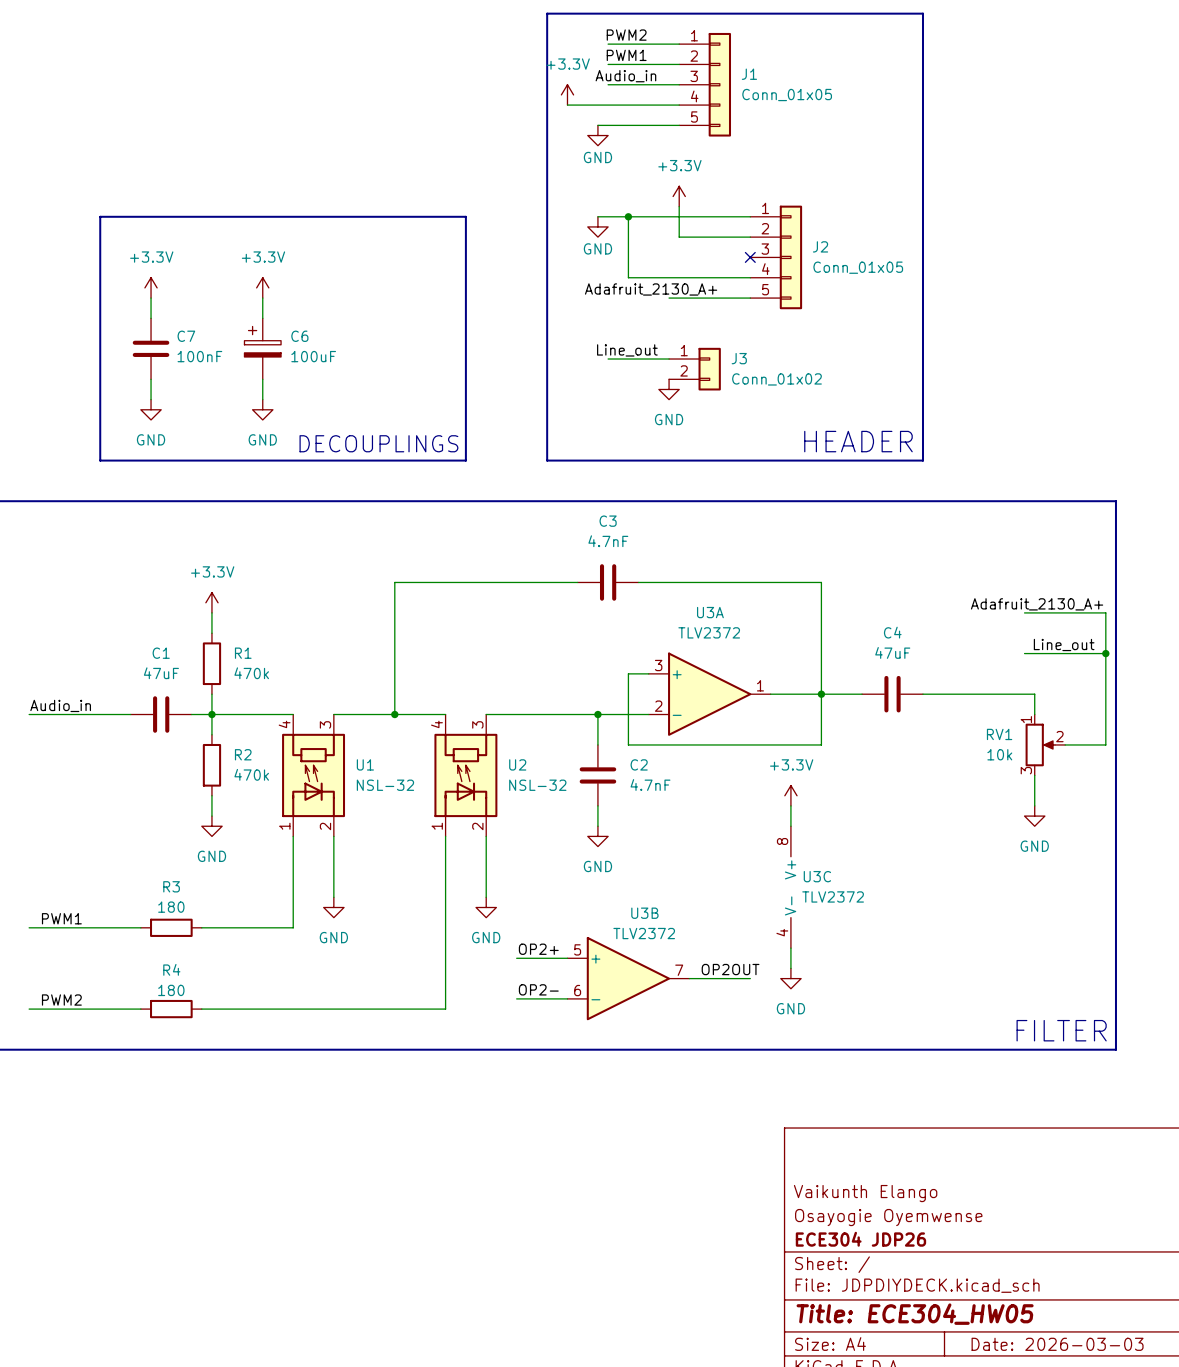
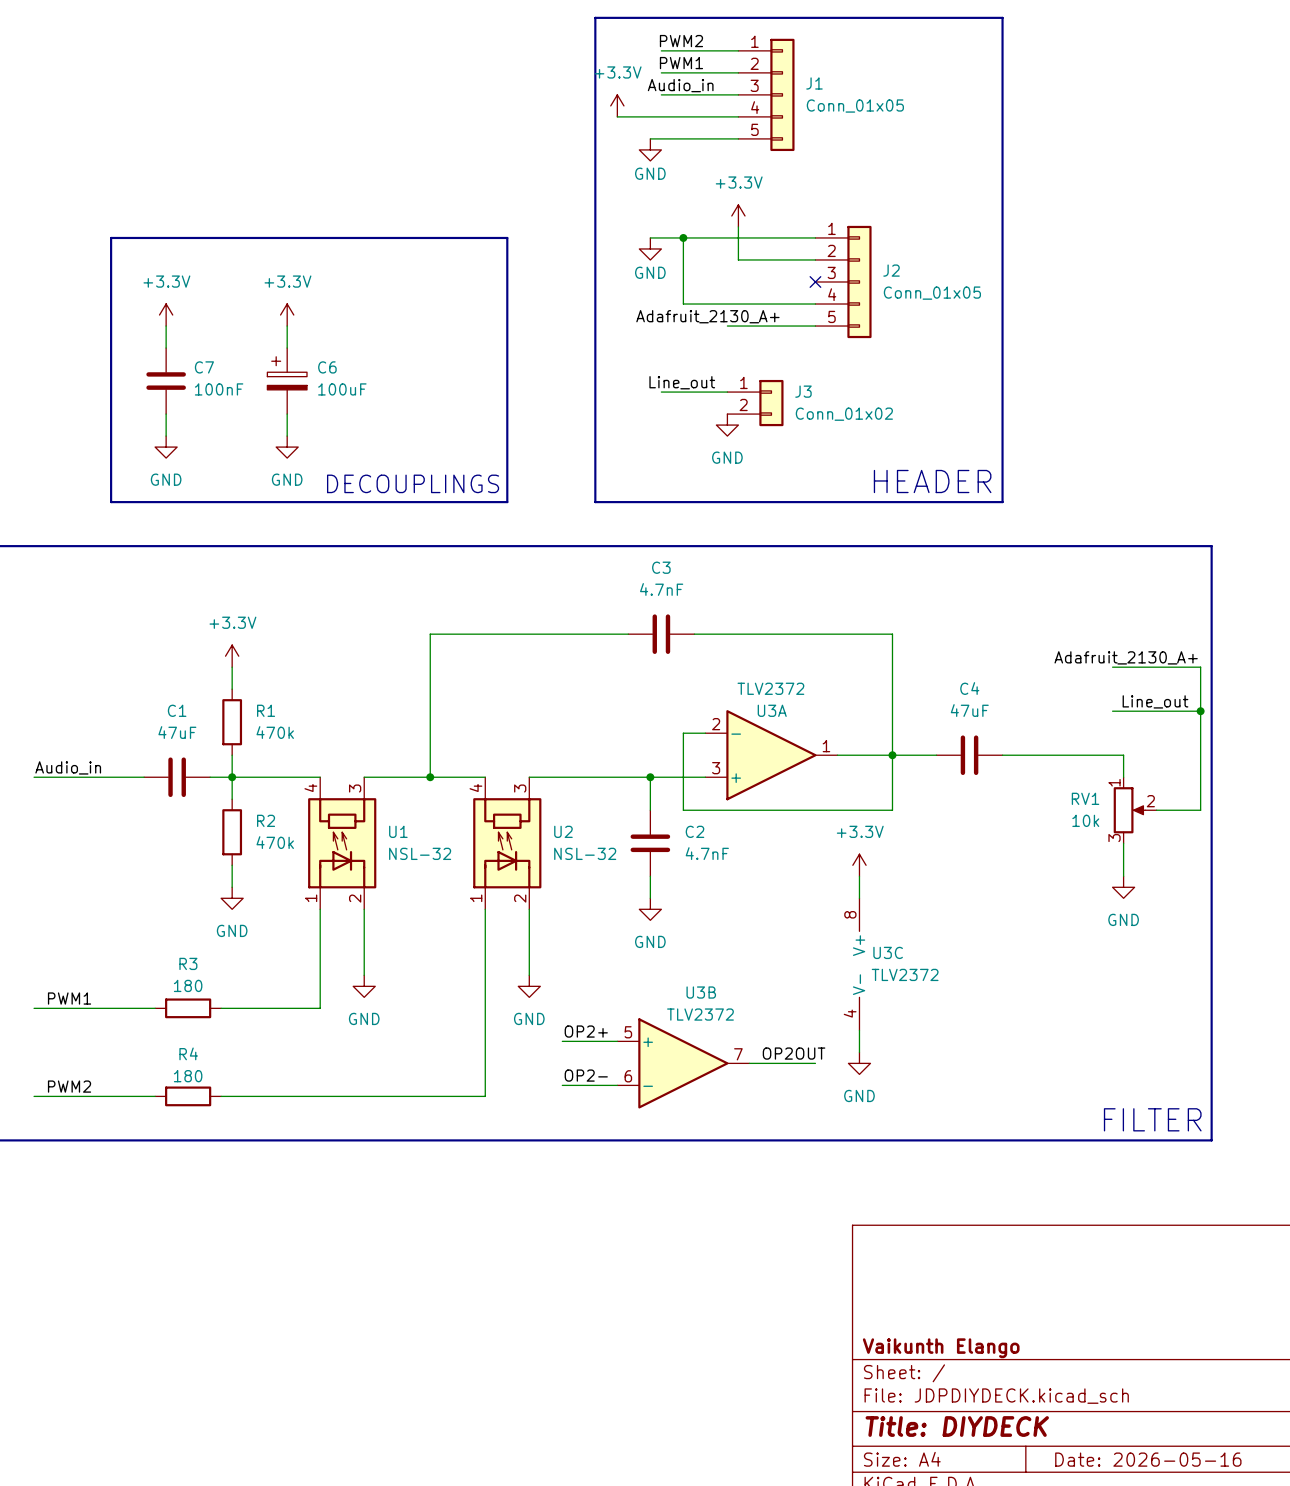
U3A name position: U3A (710, 612) -> U3A (772, 710)
U3A flip: as is (709, 694) -> up-down (771, 755)
title block: Vaikunth Elango (865, 1193) -> none
title block: Osayogie Oyemwense (888, 1217) -> none
title block: ECE304 JDP26 (860, 1239) -> Vaikunth Elango (941, 1348)
title block: Title: ECE304_HW05 (915, 1314) -> Title: DIYDECK (957, 1426)
title block: Date: 2026-03-03 (1057, 1344) -> Date: 2026-05-16 (1148, 1459)

